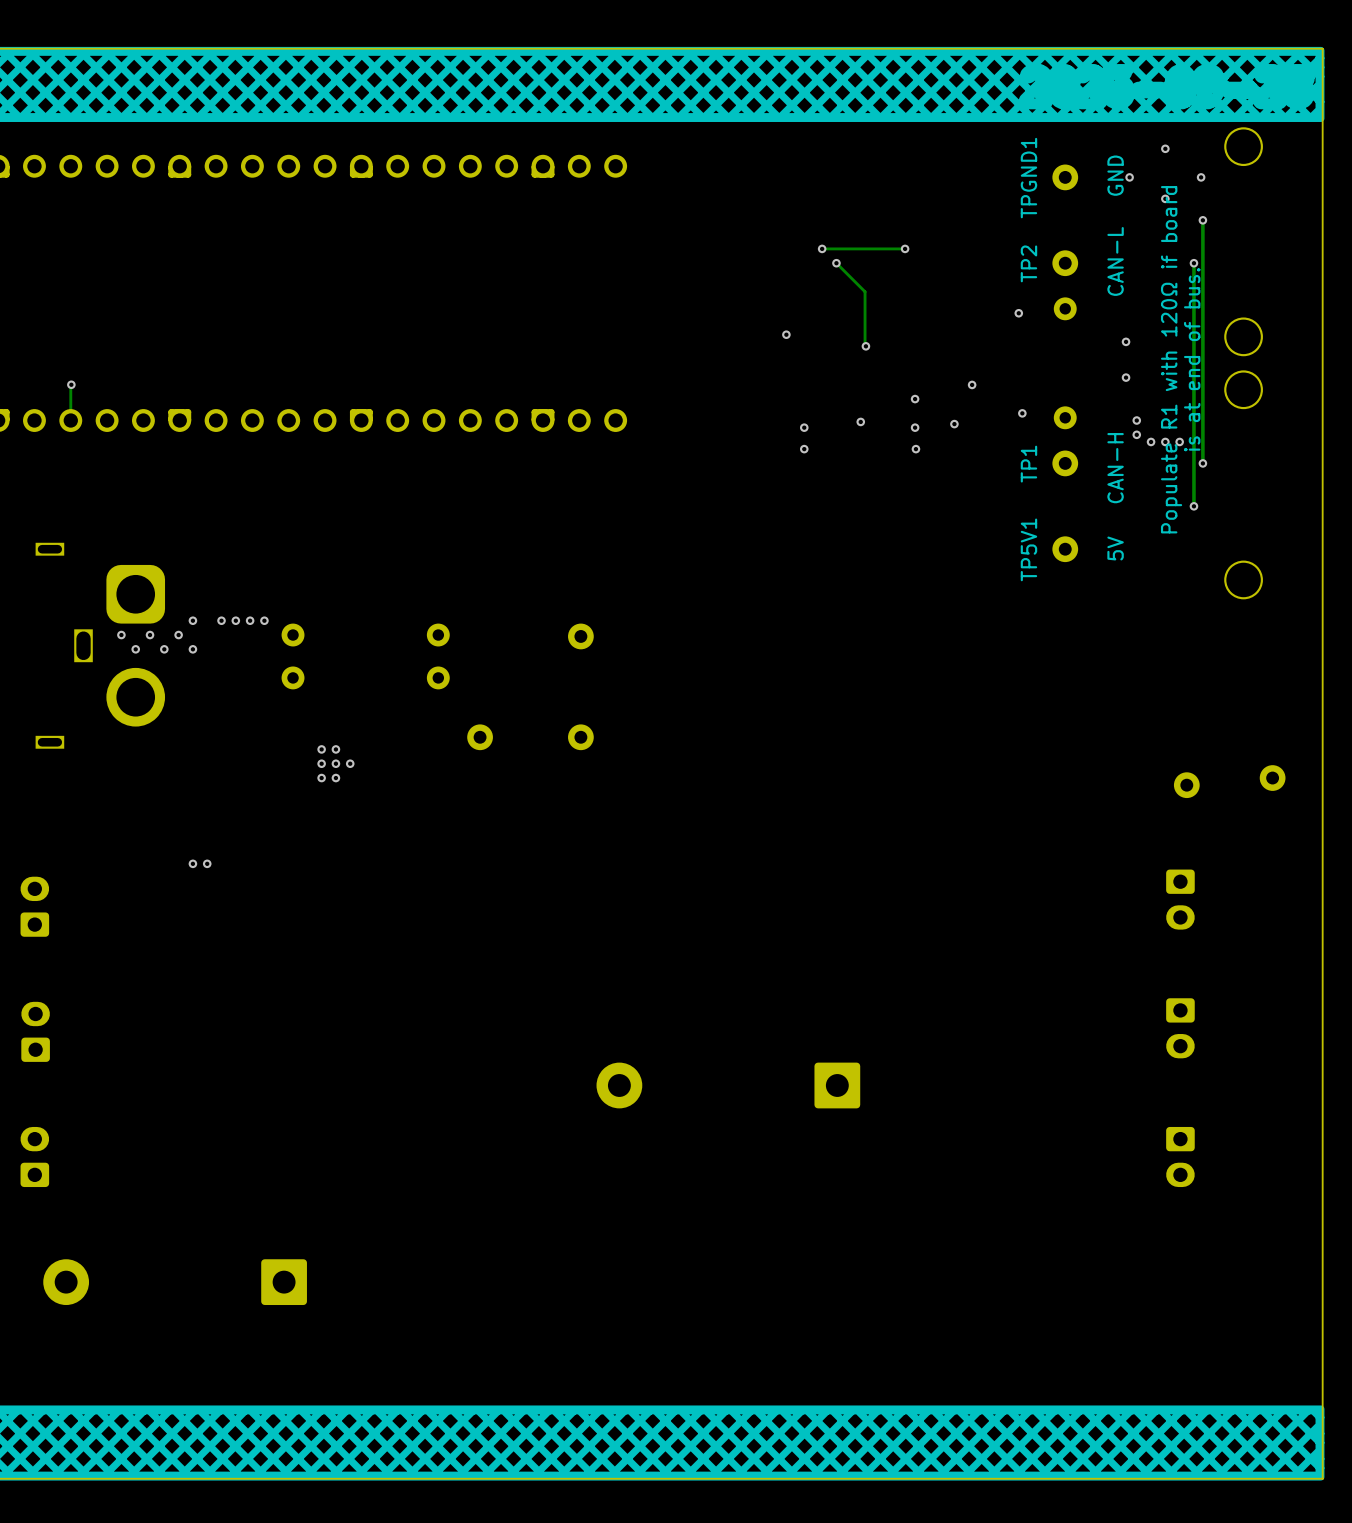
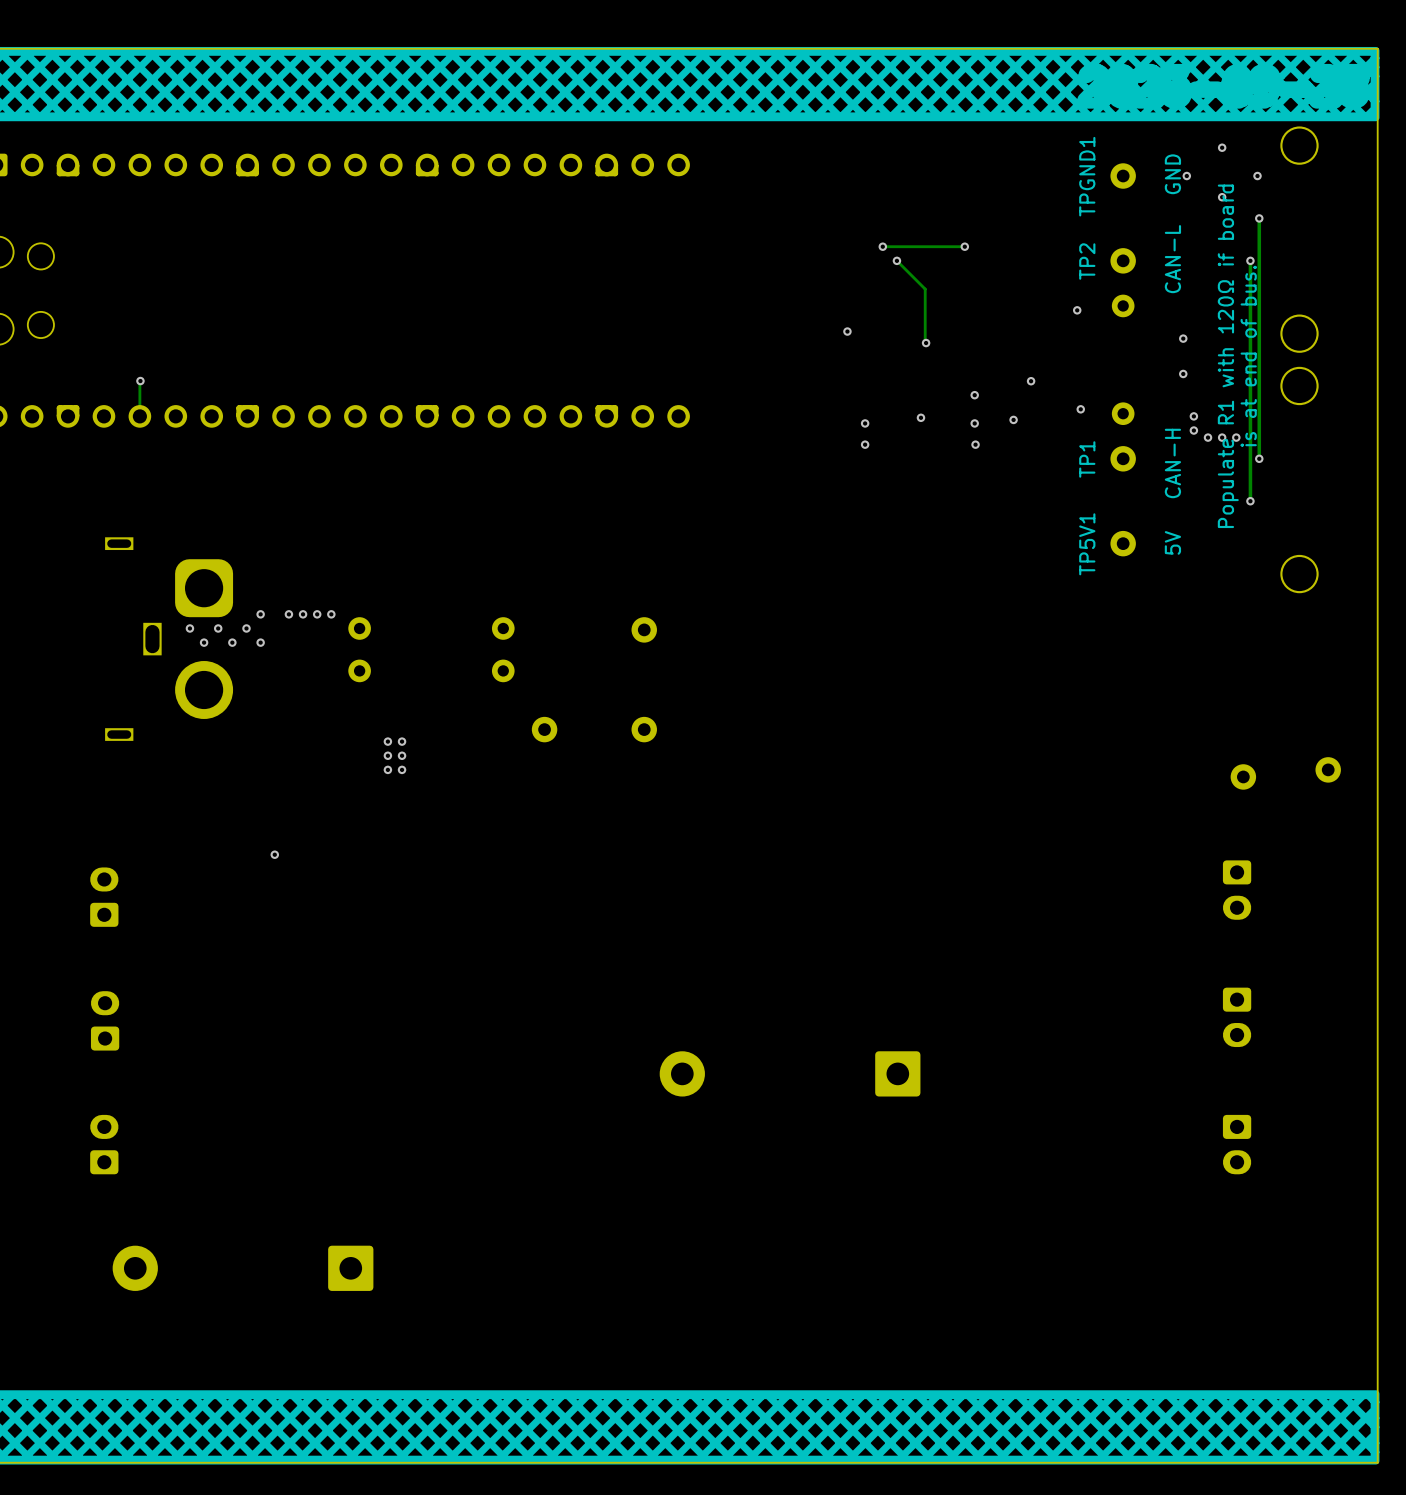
via: (350, 763) -> none
via: (192, 863) -> none

